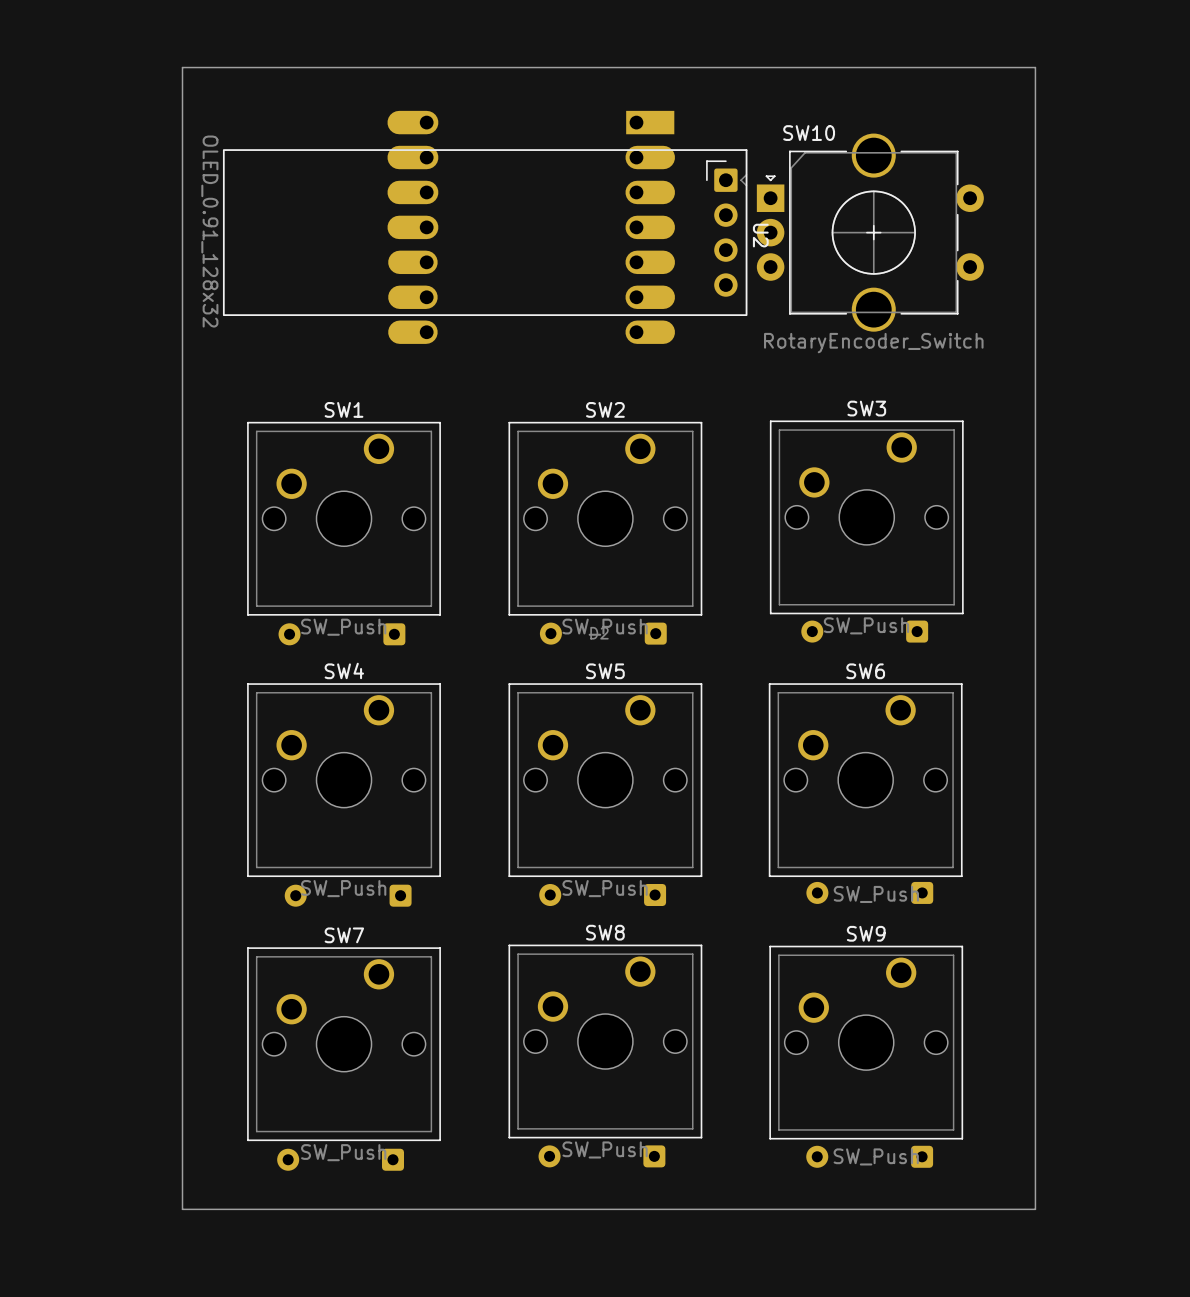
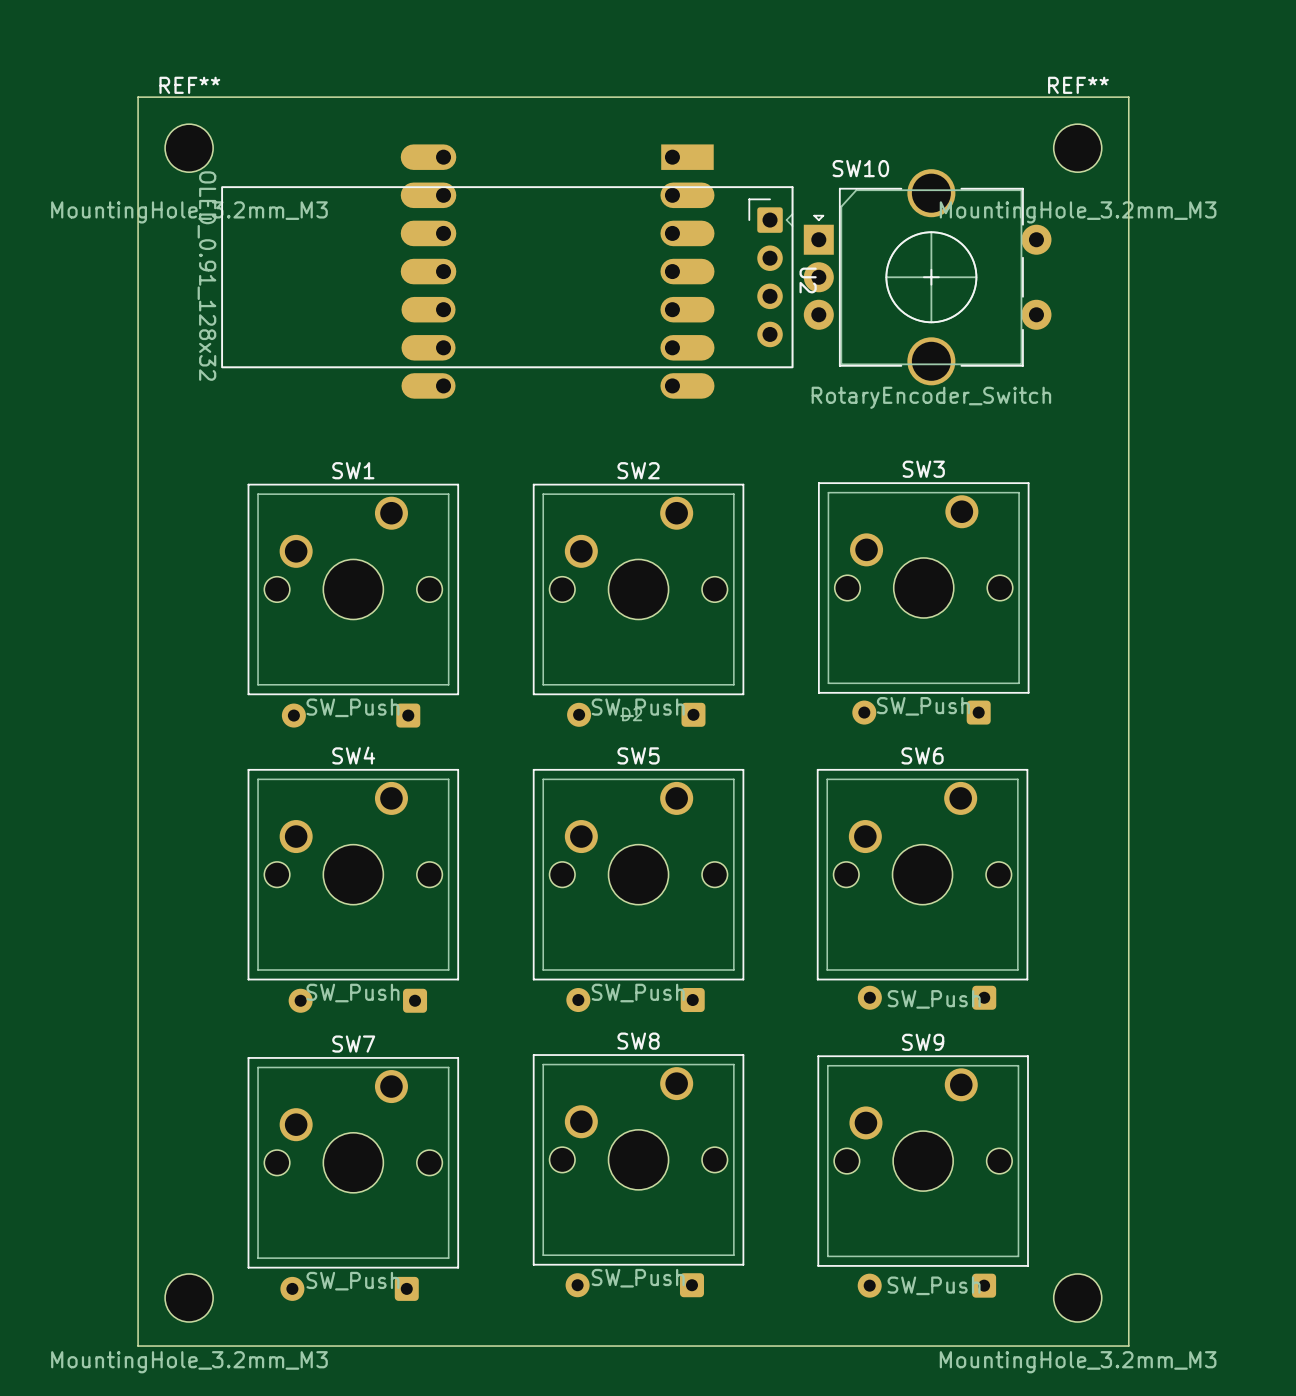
board edge: (182, 67) (182, 1209) (1035, 1209) (1035, 67) -> (177, 97) (138, 97) (138, 1346) (1128, 1346) (1128, 97) (1107, 97)
REF**: none -> MountingHole_3.2mm_M3 (189, 148)
REF**: none -> MountingHole_3.2mm_M3 (1077, 148)
part: none -> MountingHole_3.2mm_M3 (189, 1297)
part: none -> MountingHole_3.2mm_M3 (1077, 1297)

